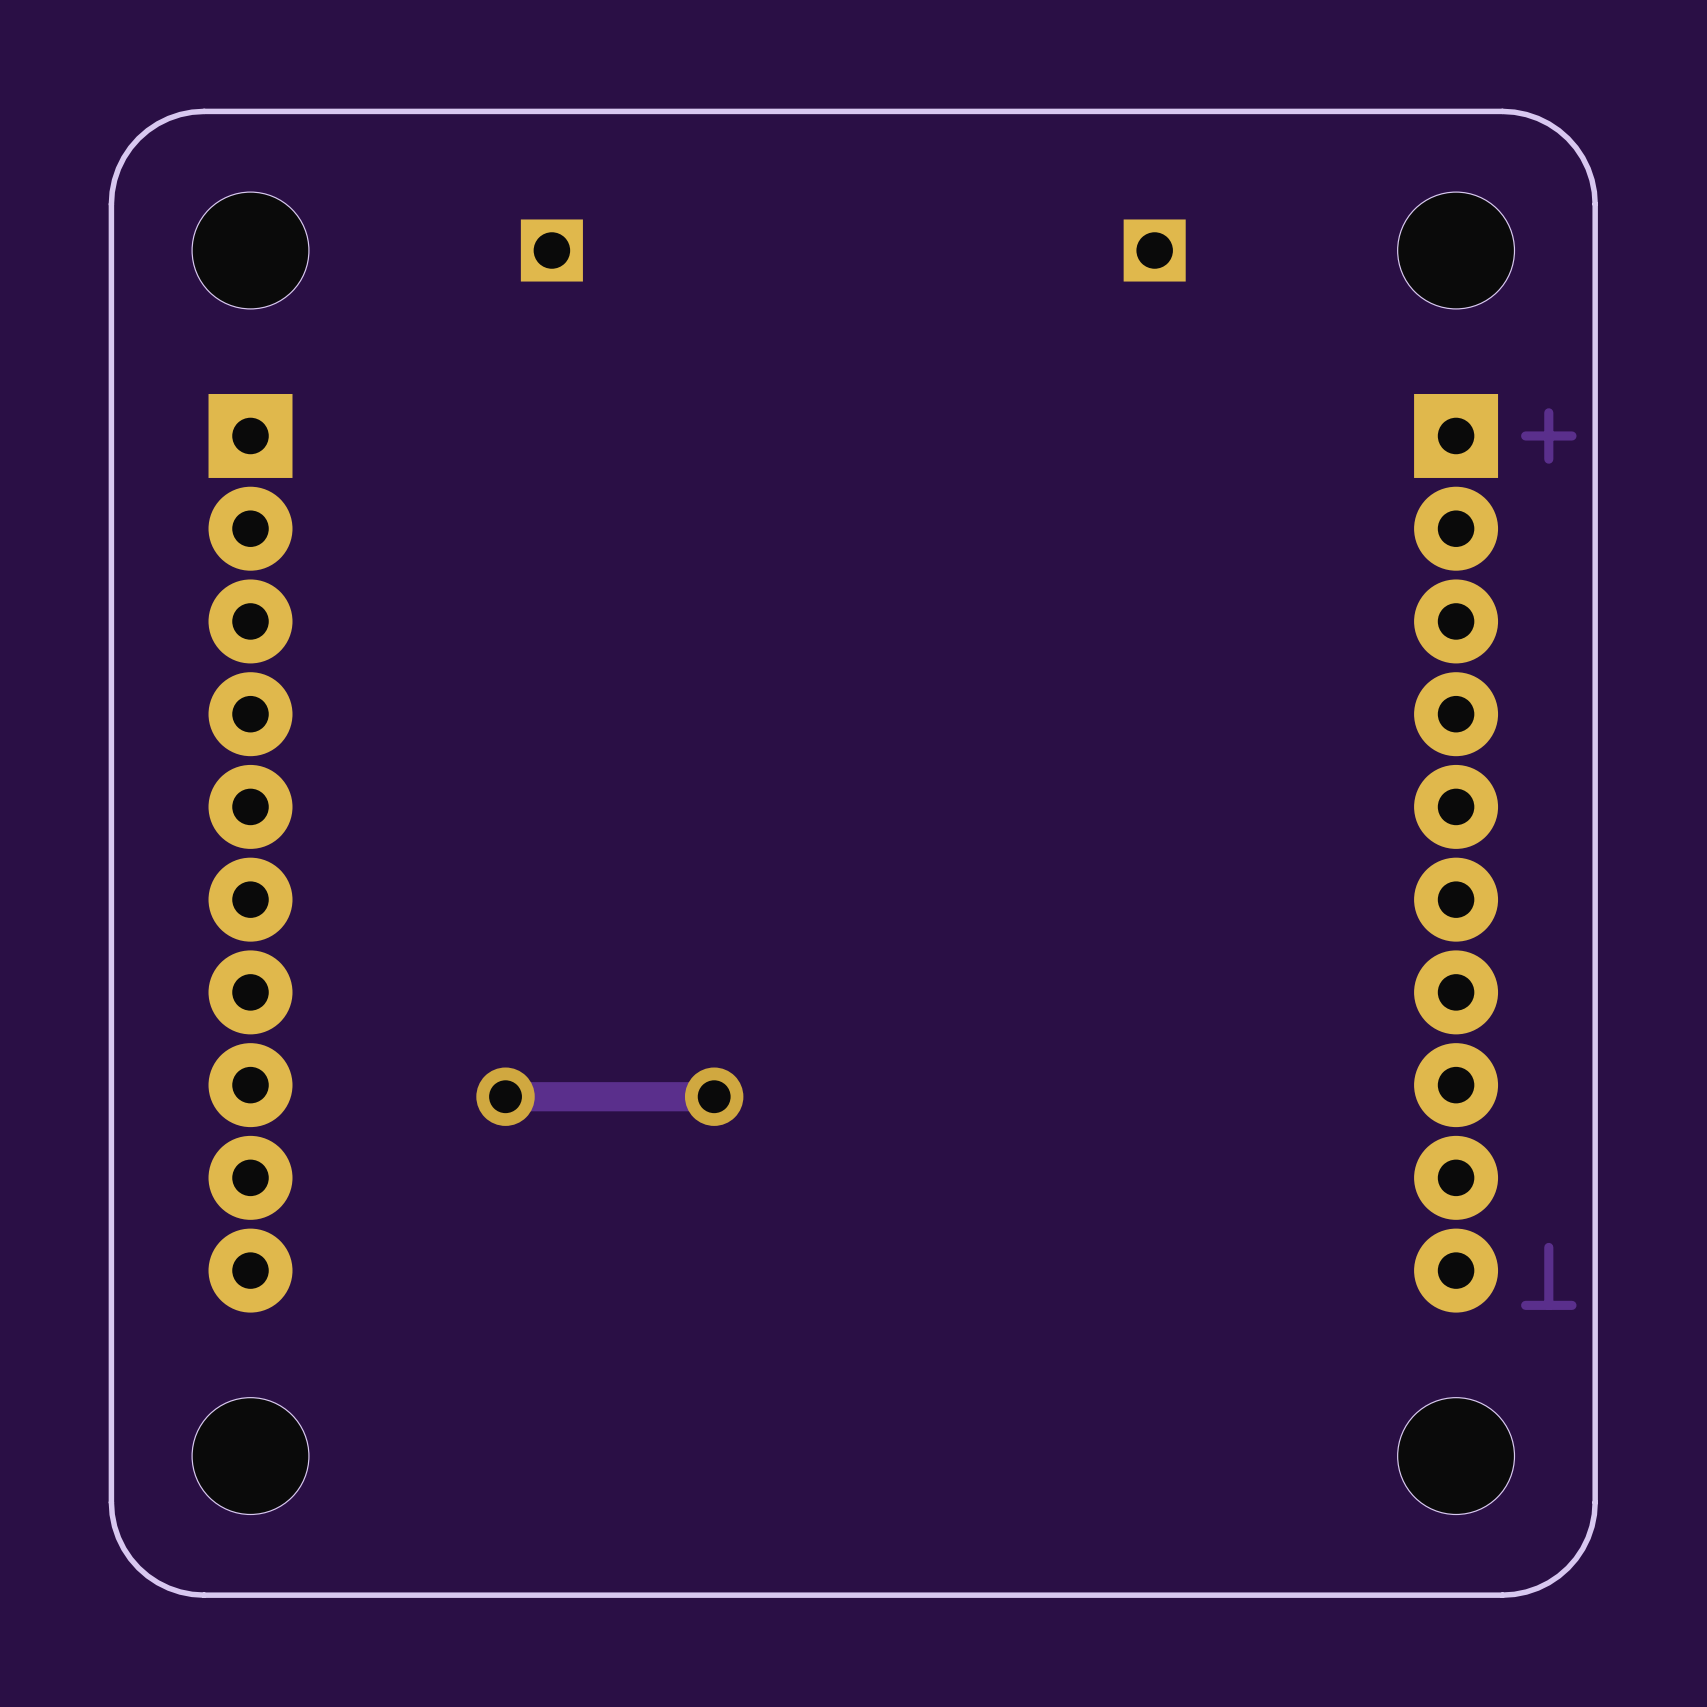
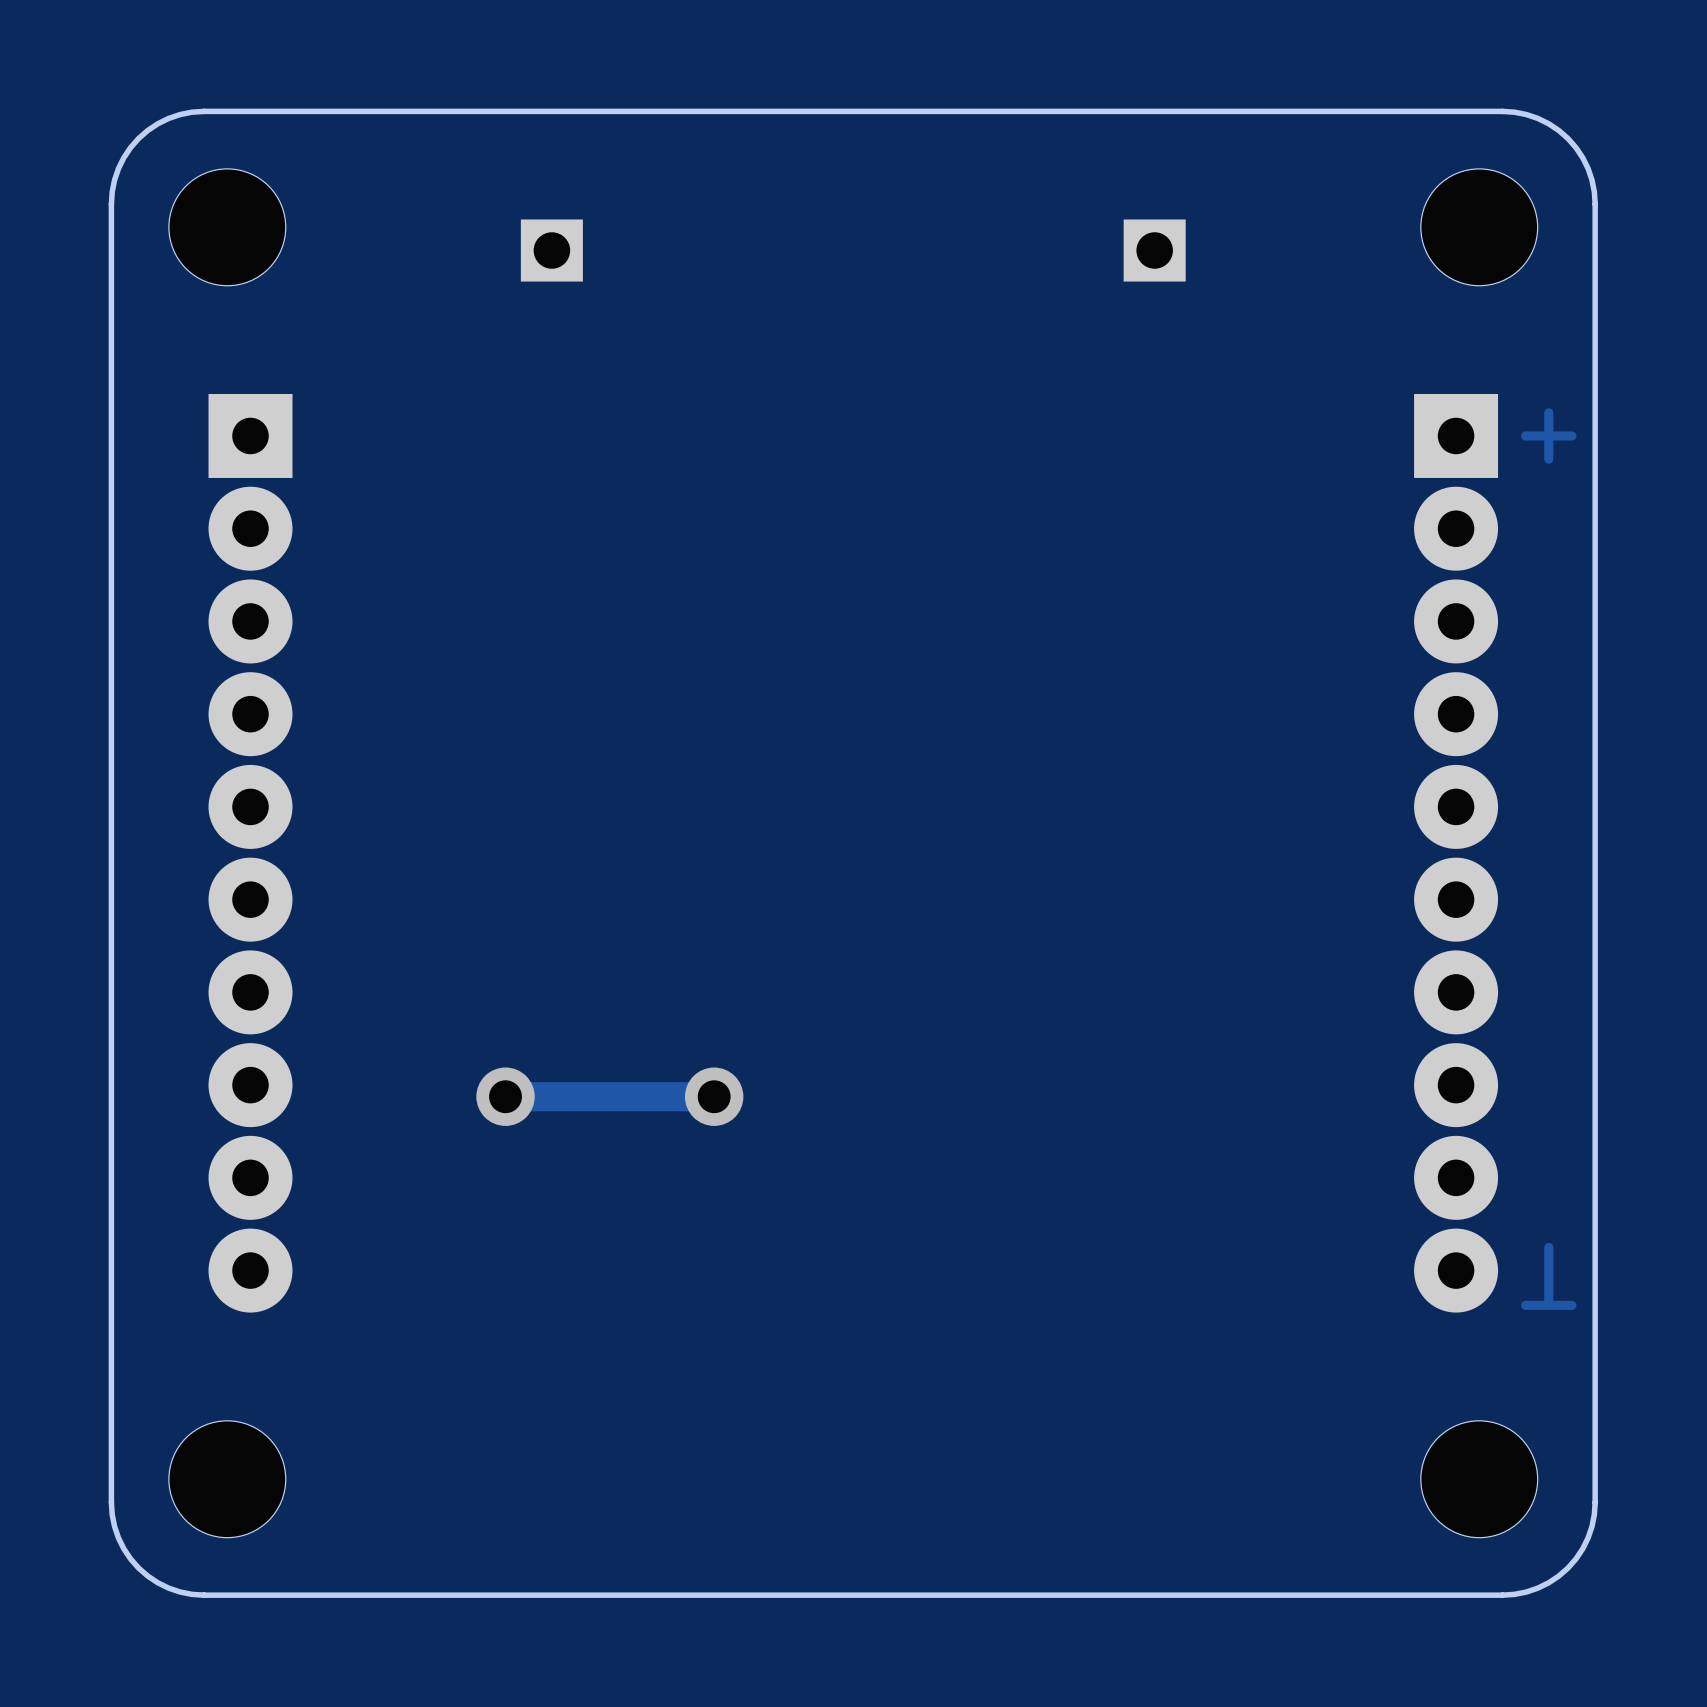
part position: (250, 250) -> (227, 227)
part position: (1456, 250) -> (1479, 227)
part position: (250, 1456) -> (227, 1479)
part position: (1456, 1456) -> (1479, 1479)

